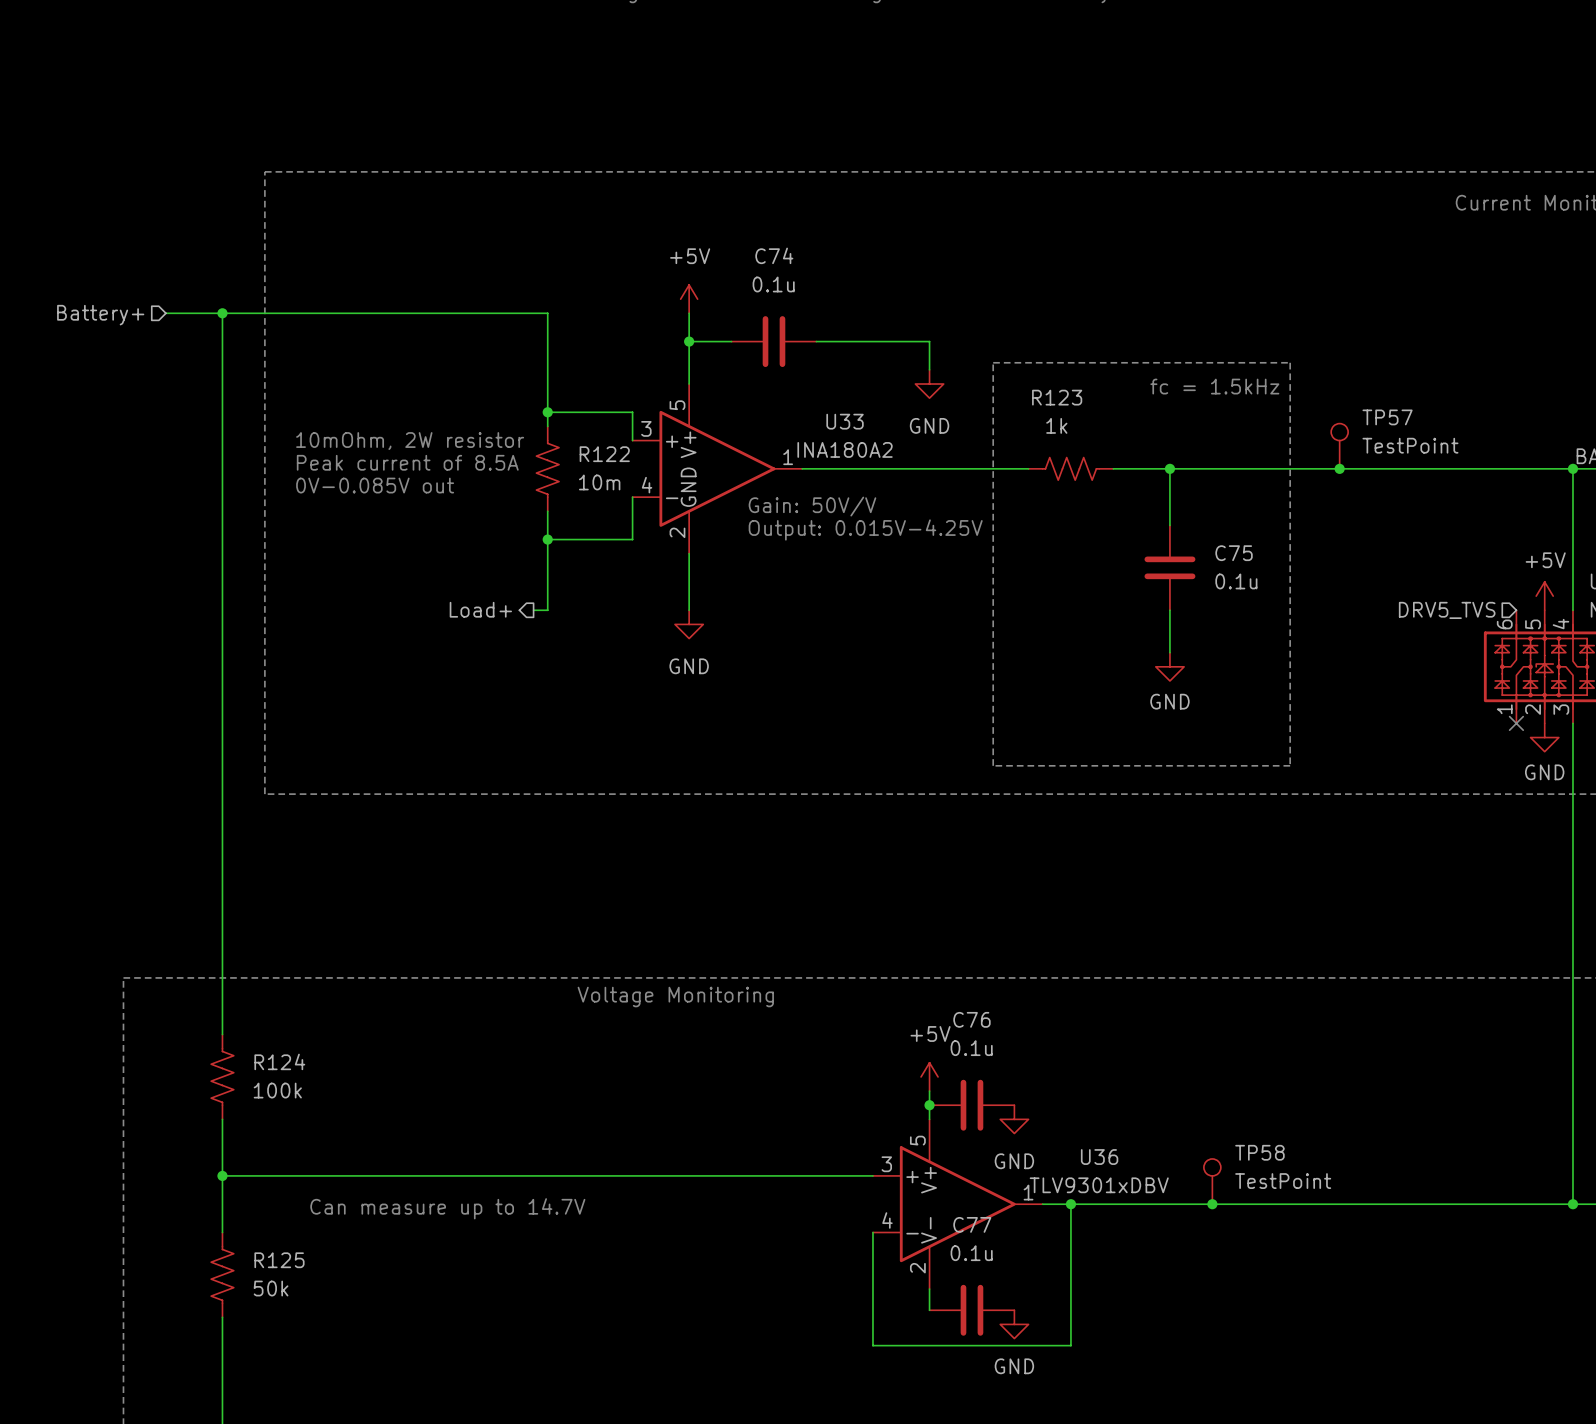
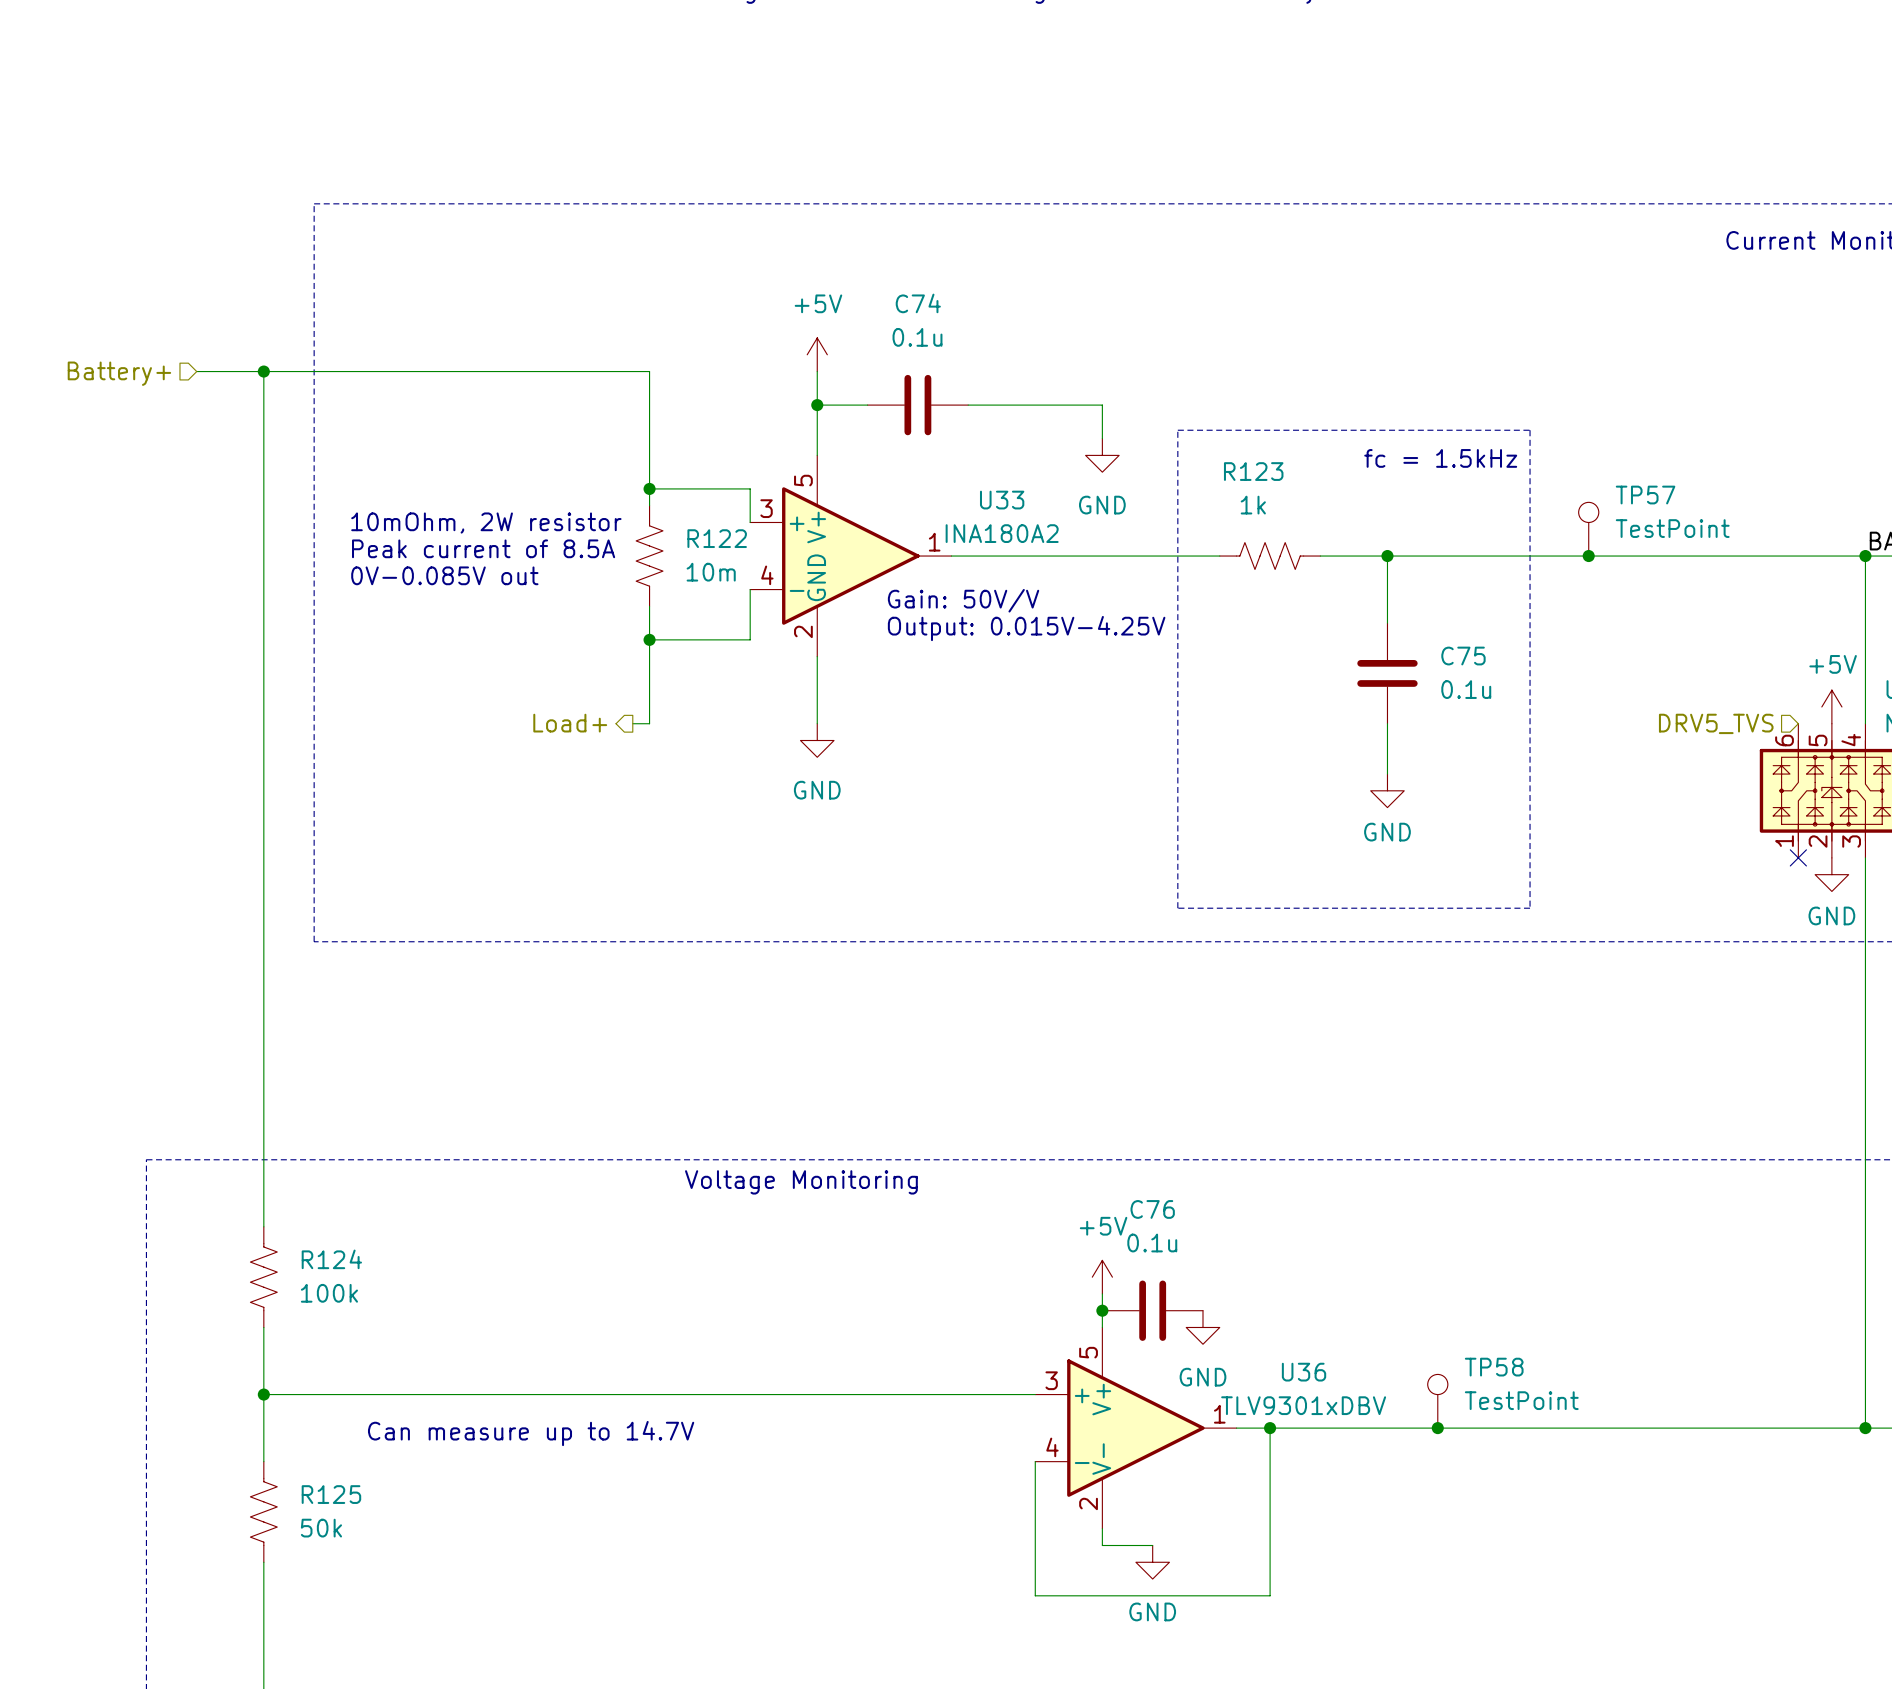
wire: (929, 1303) (929, 1310) -> (1102, 1545) (1152, 1545)
C77: 0.1u (971, 1310) -> none
power symbol position: GND (1014, 1324) -> GND (1152, 1562)

